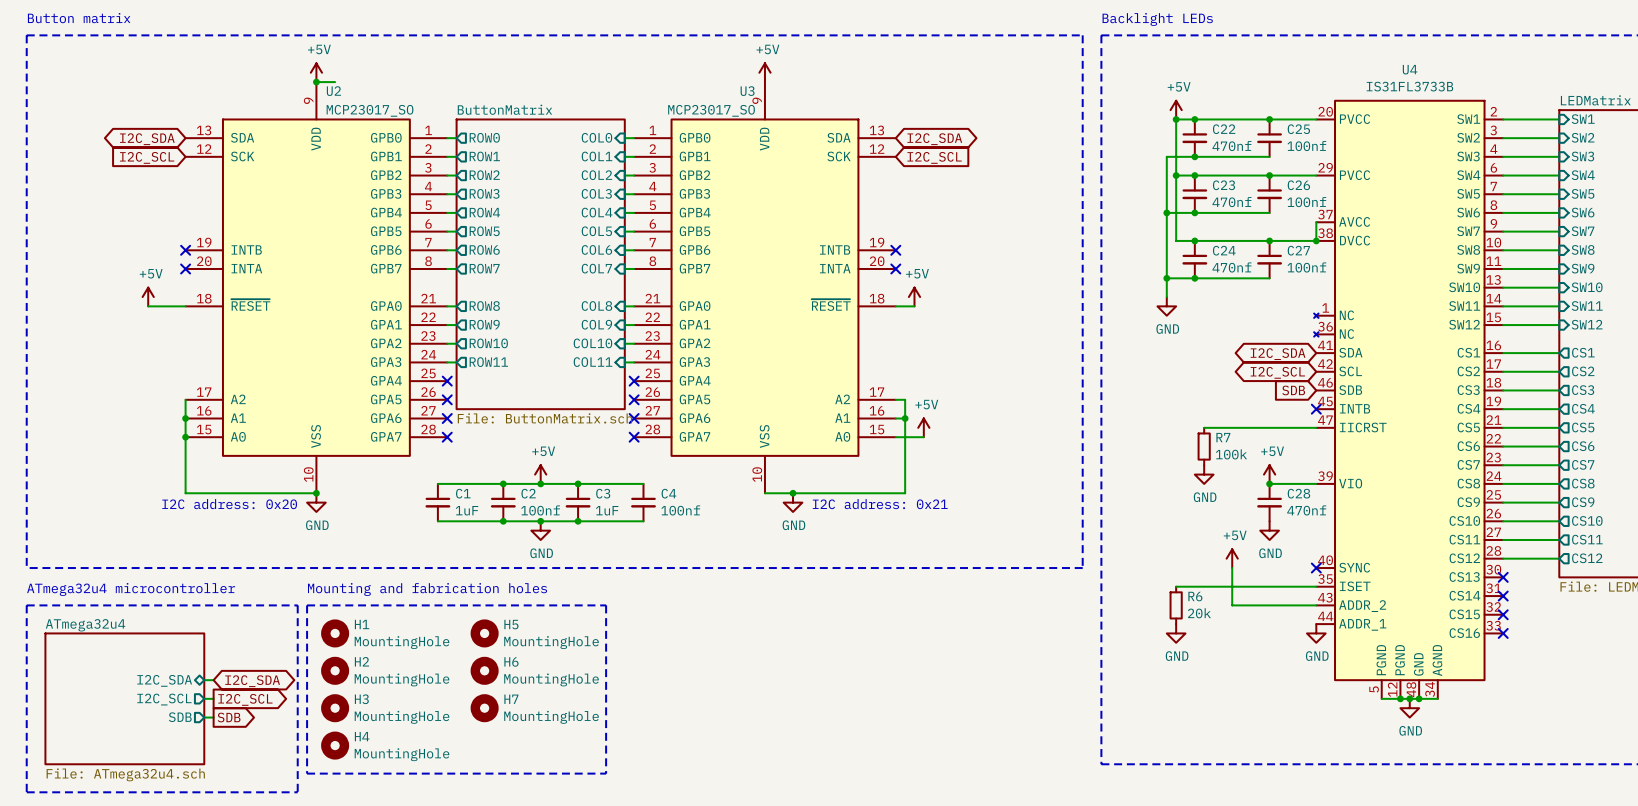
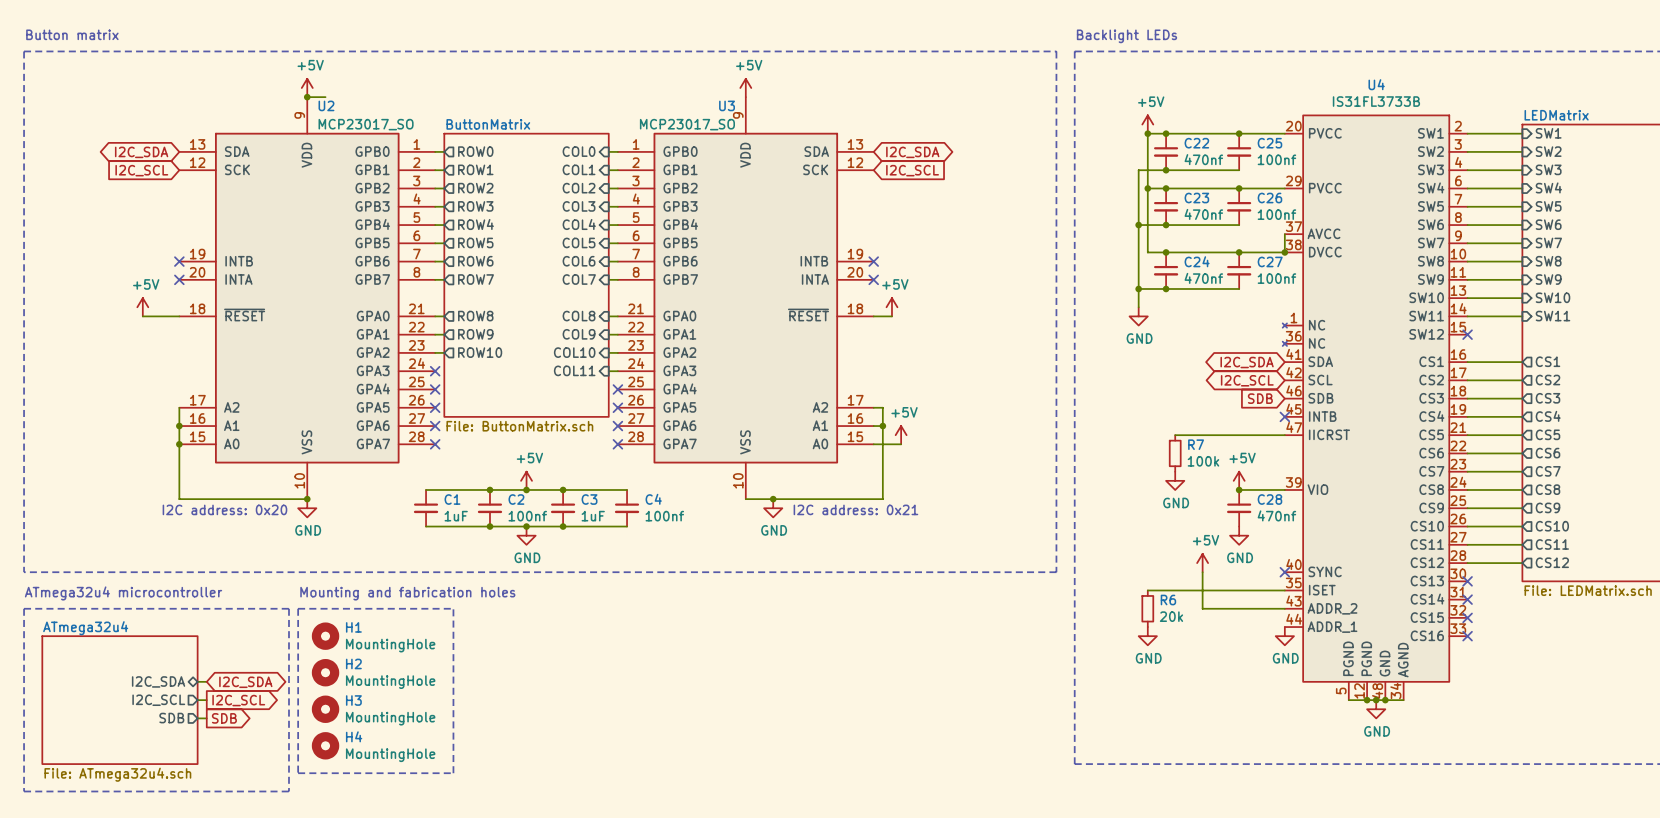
sheet pin: SW12 (1587, 324) -> none
wire: (1503, 325) (1559, 325) -> none
no-connect mark: none -> (1467, 334)
wire: (447, 362) (456, 362) -> none
no-connect mark: none -> (435, 371)
sheet pin: ROW11 (488, 362) -> none
line: (465, 605) (606, 605) (606, 773) (465, 773) -> (453, 608) (453, 773)
H5: MountingHole (484, 633) -> none
H6: MountingHole (484, 670) -> none
H7: MountingHole (484, 708) -> none

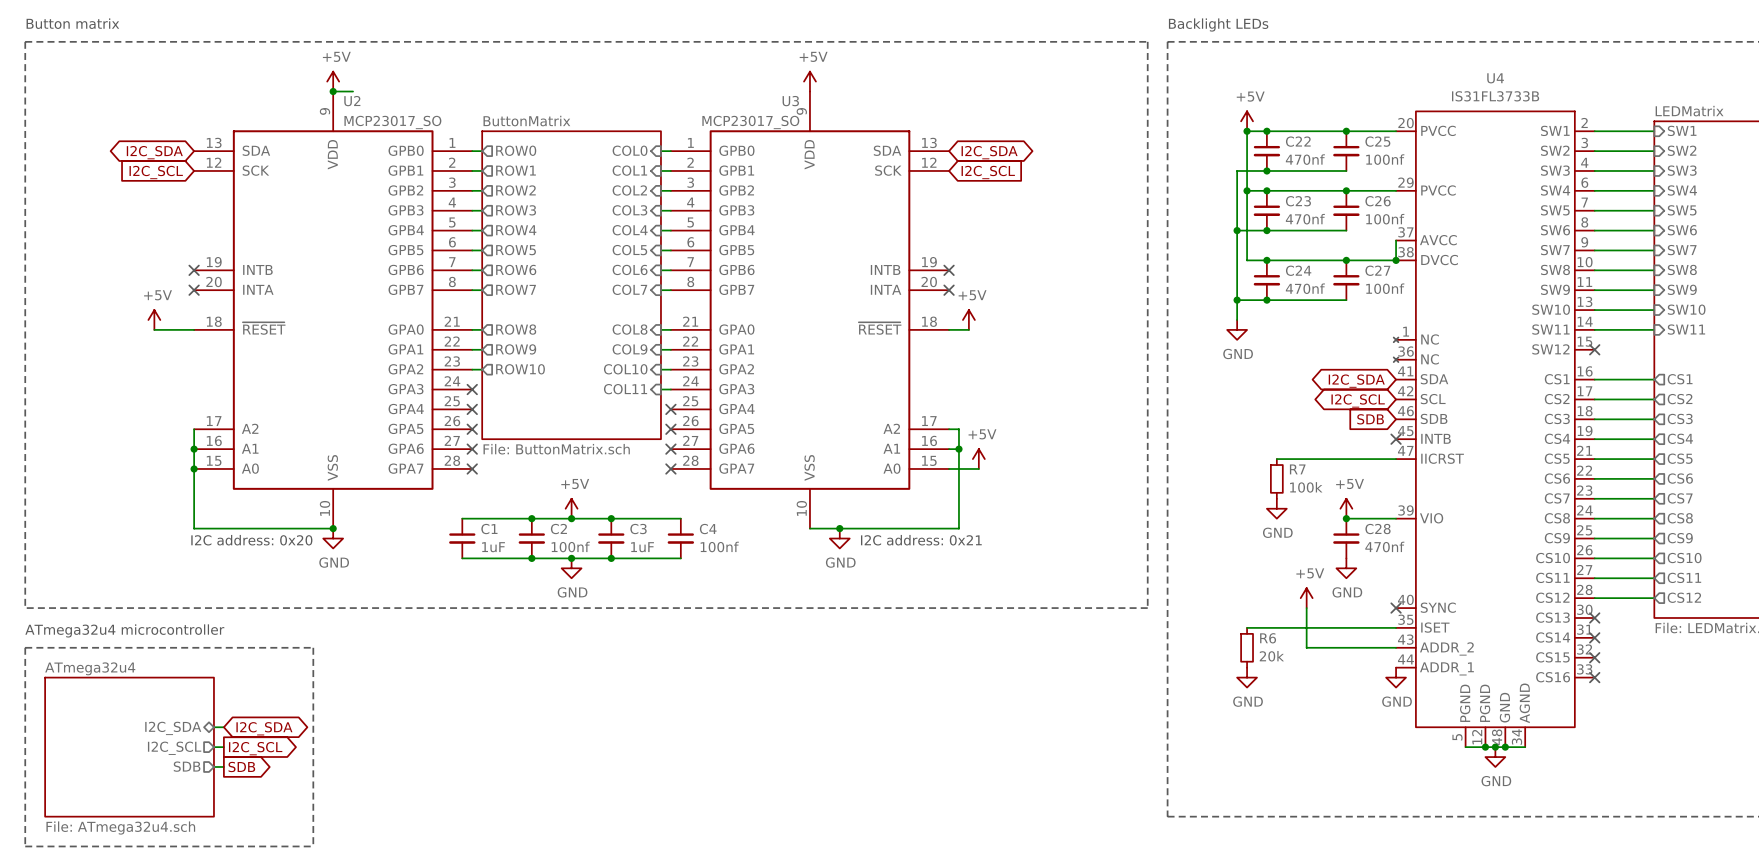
text: Mounting and fabrication holes (407, 593) -> none
line: (298, 608) (298, 773) (453, 773) (453, 608) (298, 608) -> none
H1: MountingHole (325, 636) -> none
H2: MountingHole (325, 672) -> none
H3: MountingHole (325, 709) -> none
H4: MountingHole (325, 745) -> none

